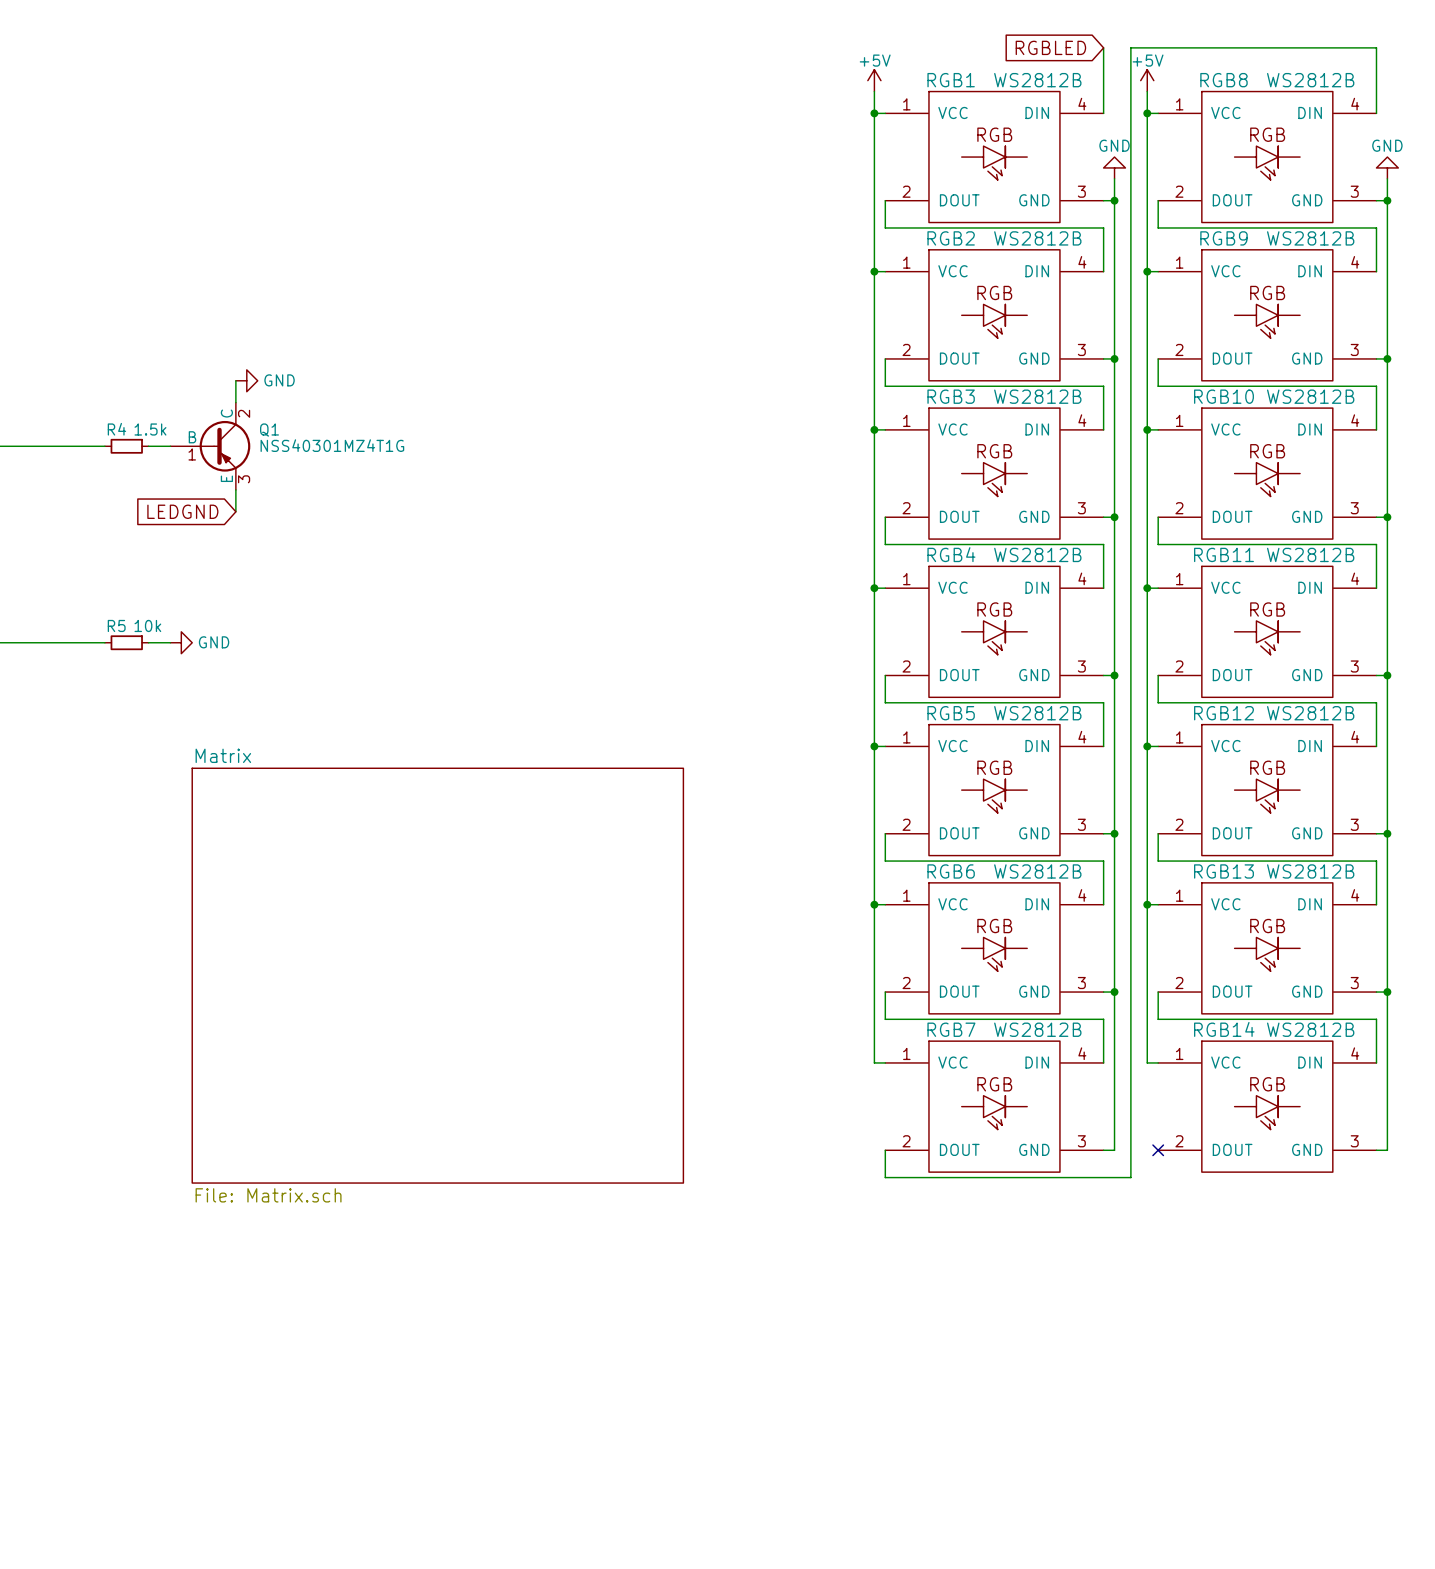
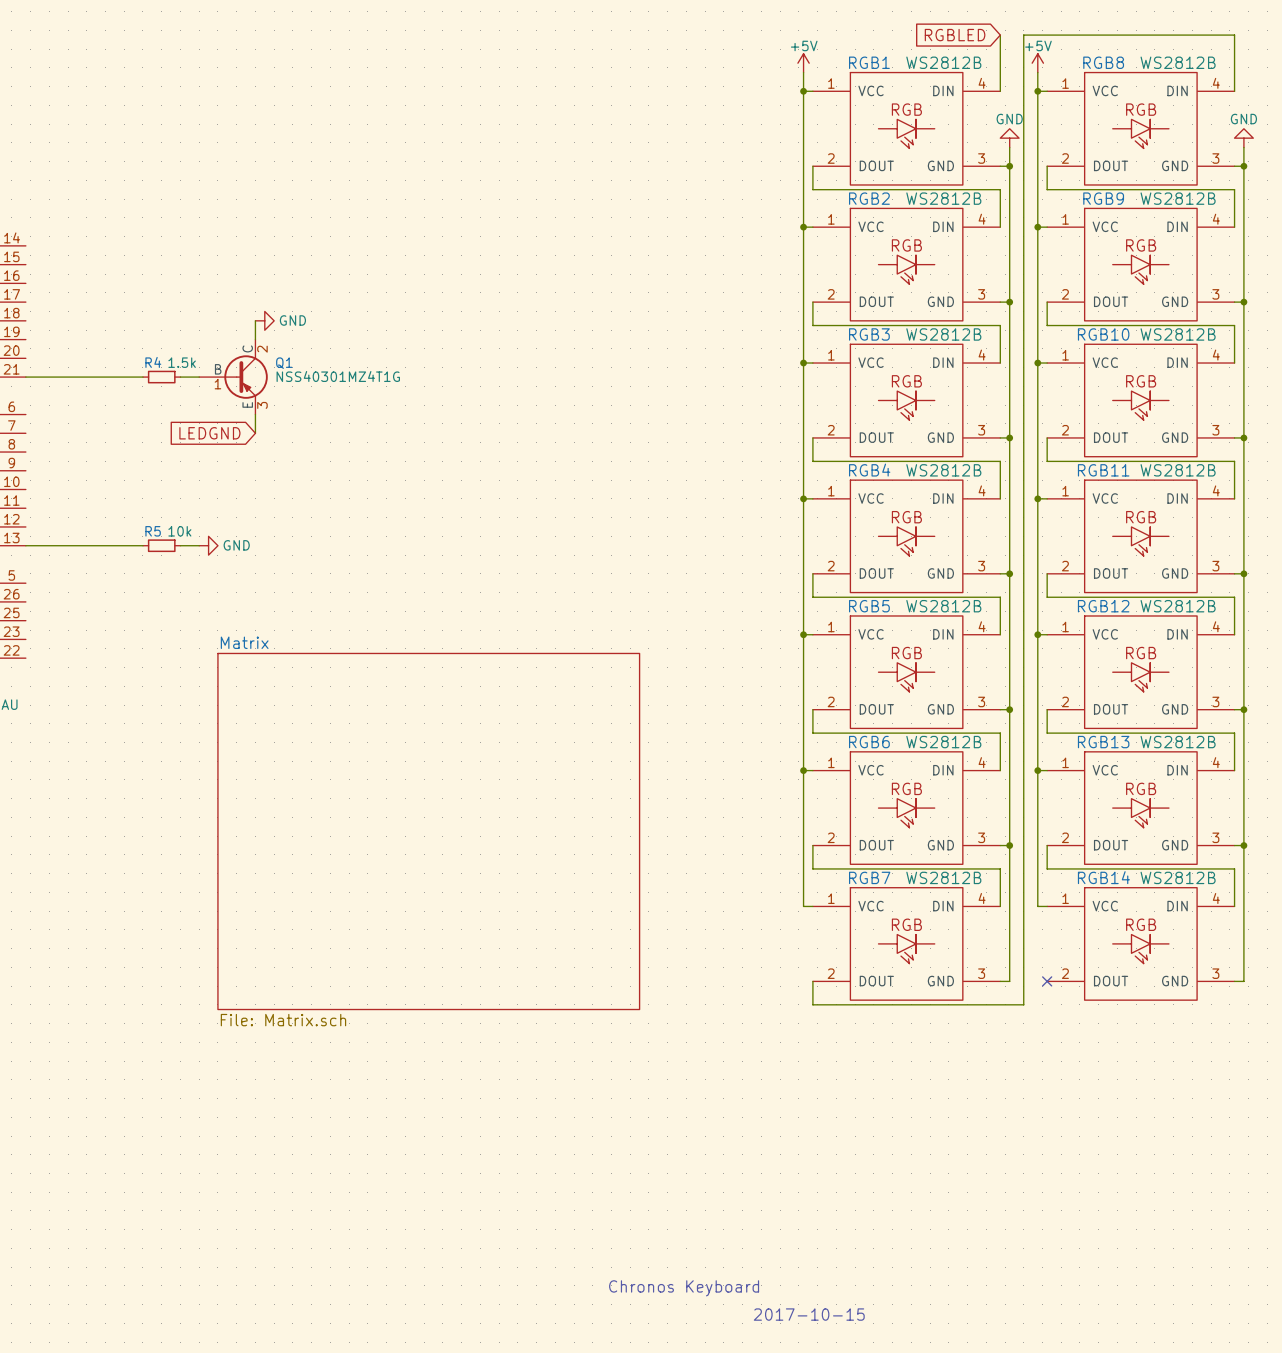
text: none -> Chronos Keyboard (684, 1288)
text: none -> 2017-10-15 (809, 1314)

